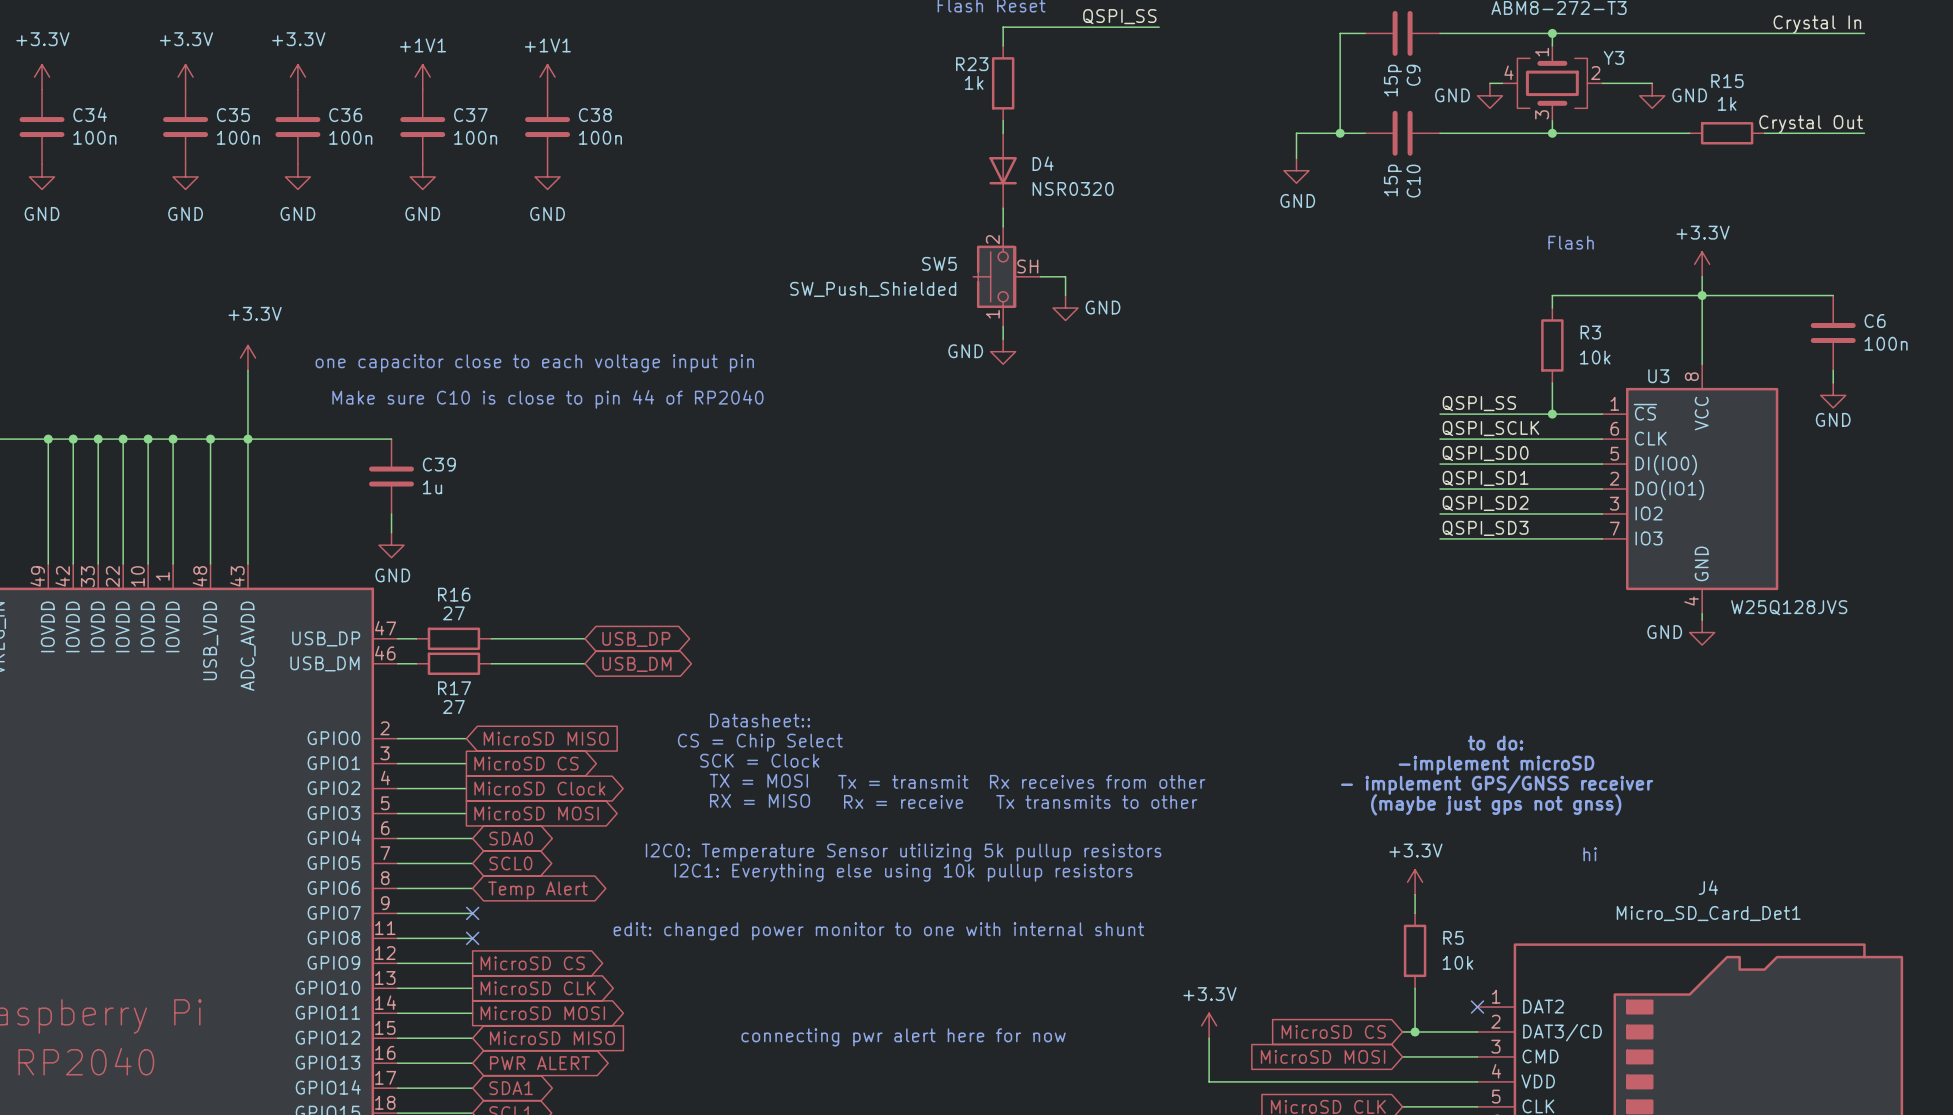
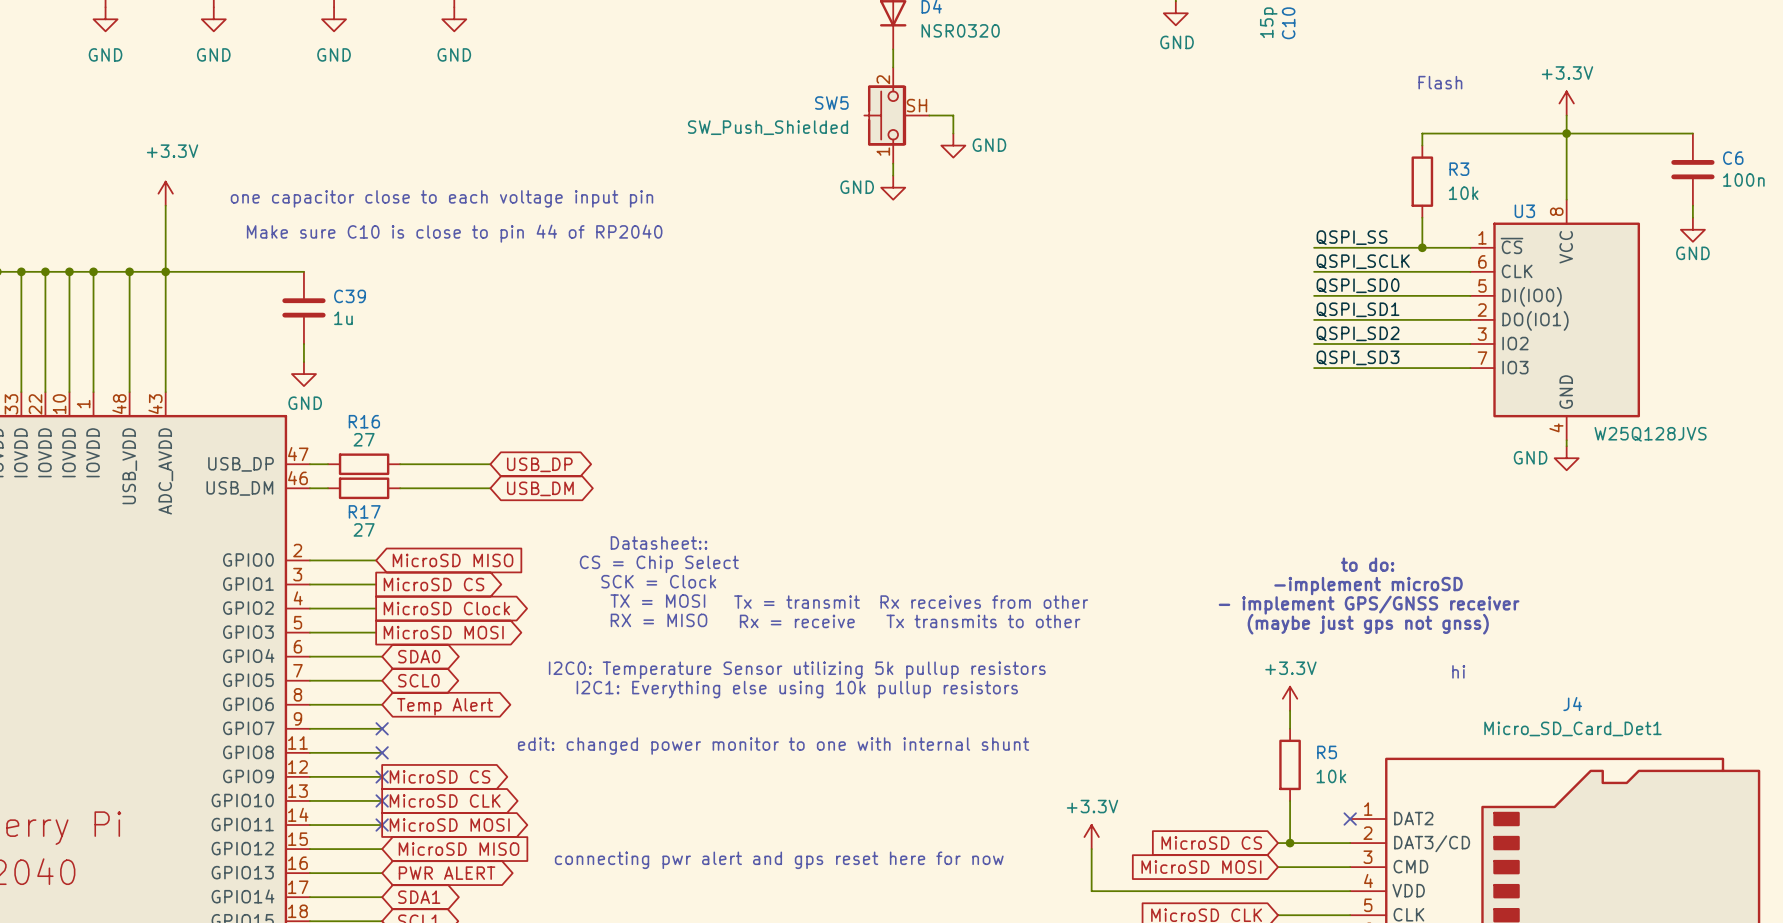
no-connect mark: none -> (382, 776)
no-connect mark: none -> (382, 800)
no-connect mark: none -> (382, 825)
text: connecting pwr alert here for now (903, 1037) -> connecting pwr alert and gps reset here for now (779, 860)

